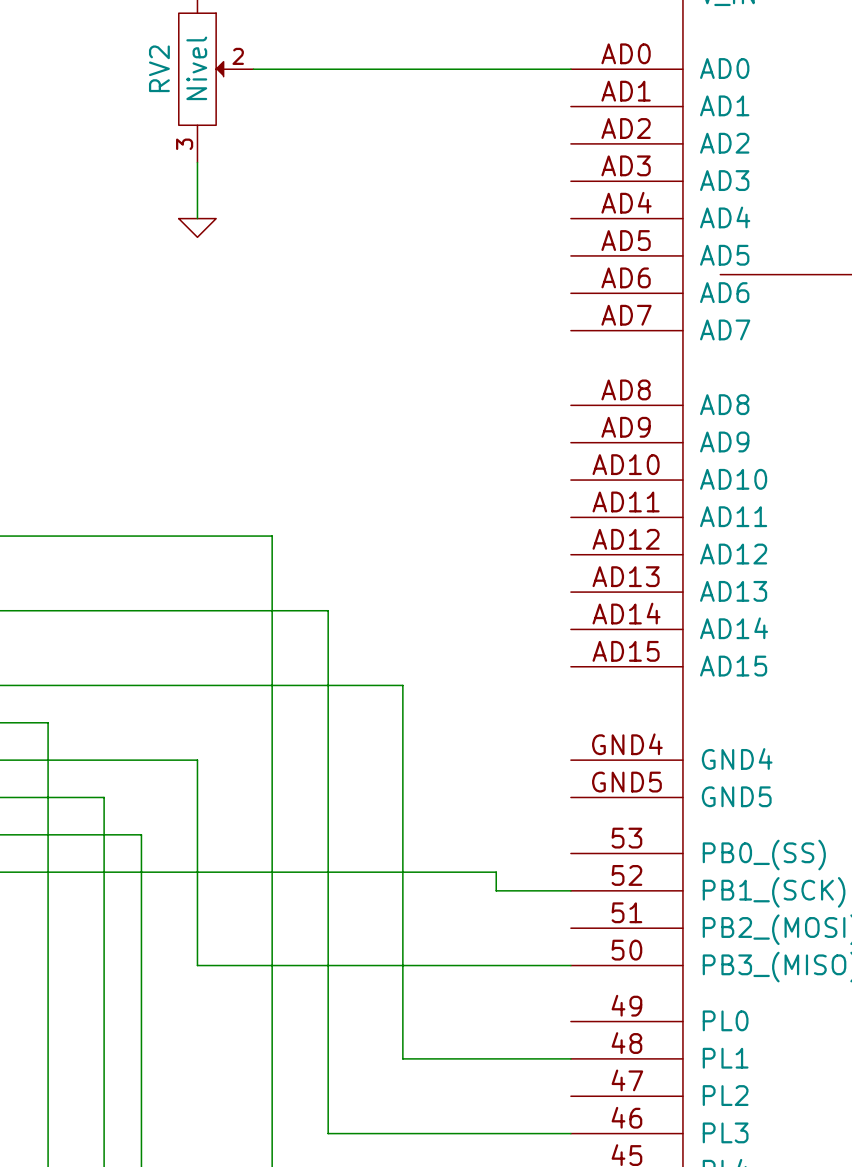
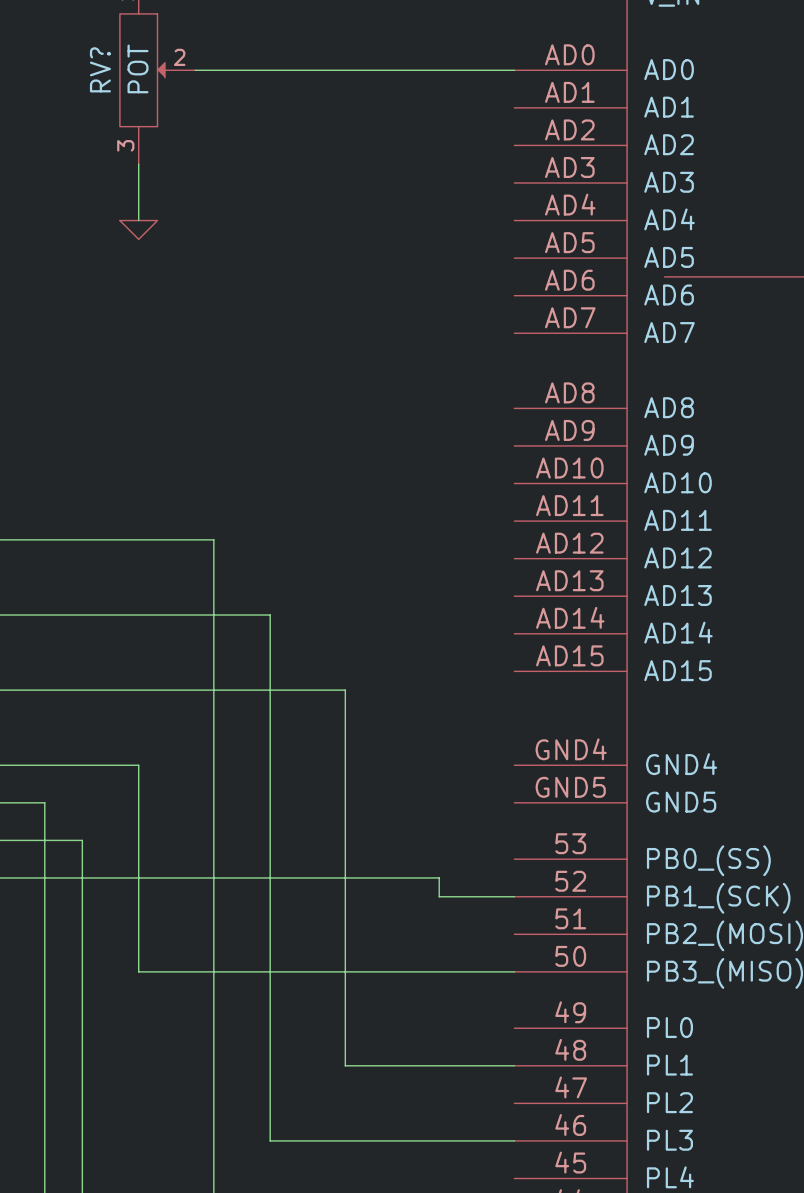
RV2 name: RV2 (159, 68) -> RV? (100, 69)
RV2 value: Nivel (196, 68) -> POT (138, 68)

